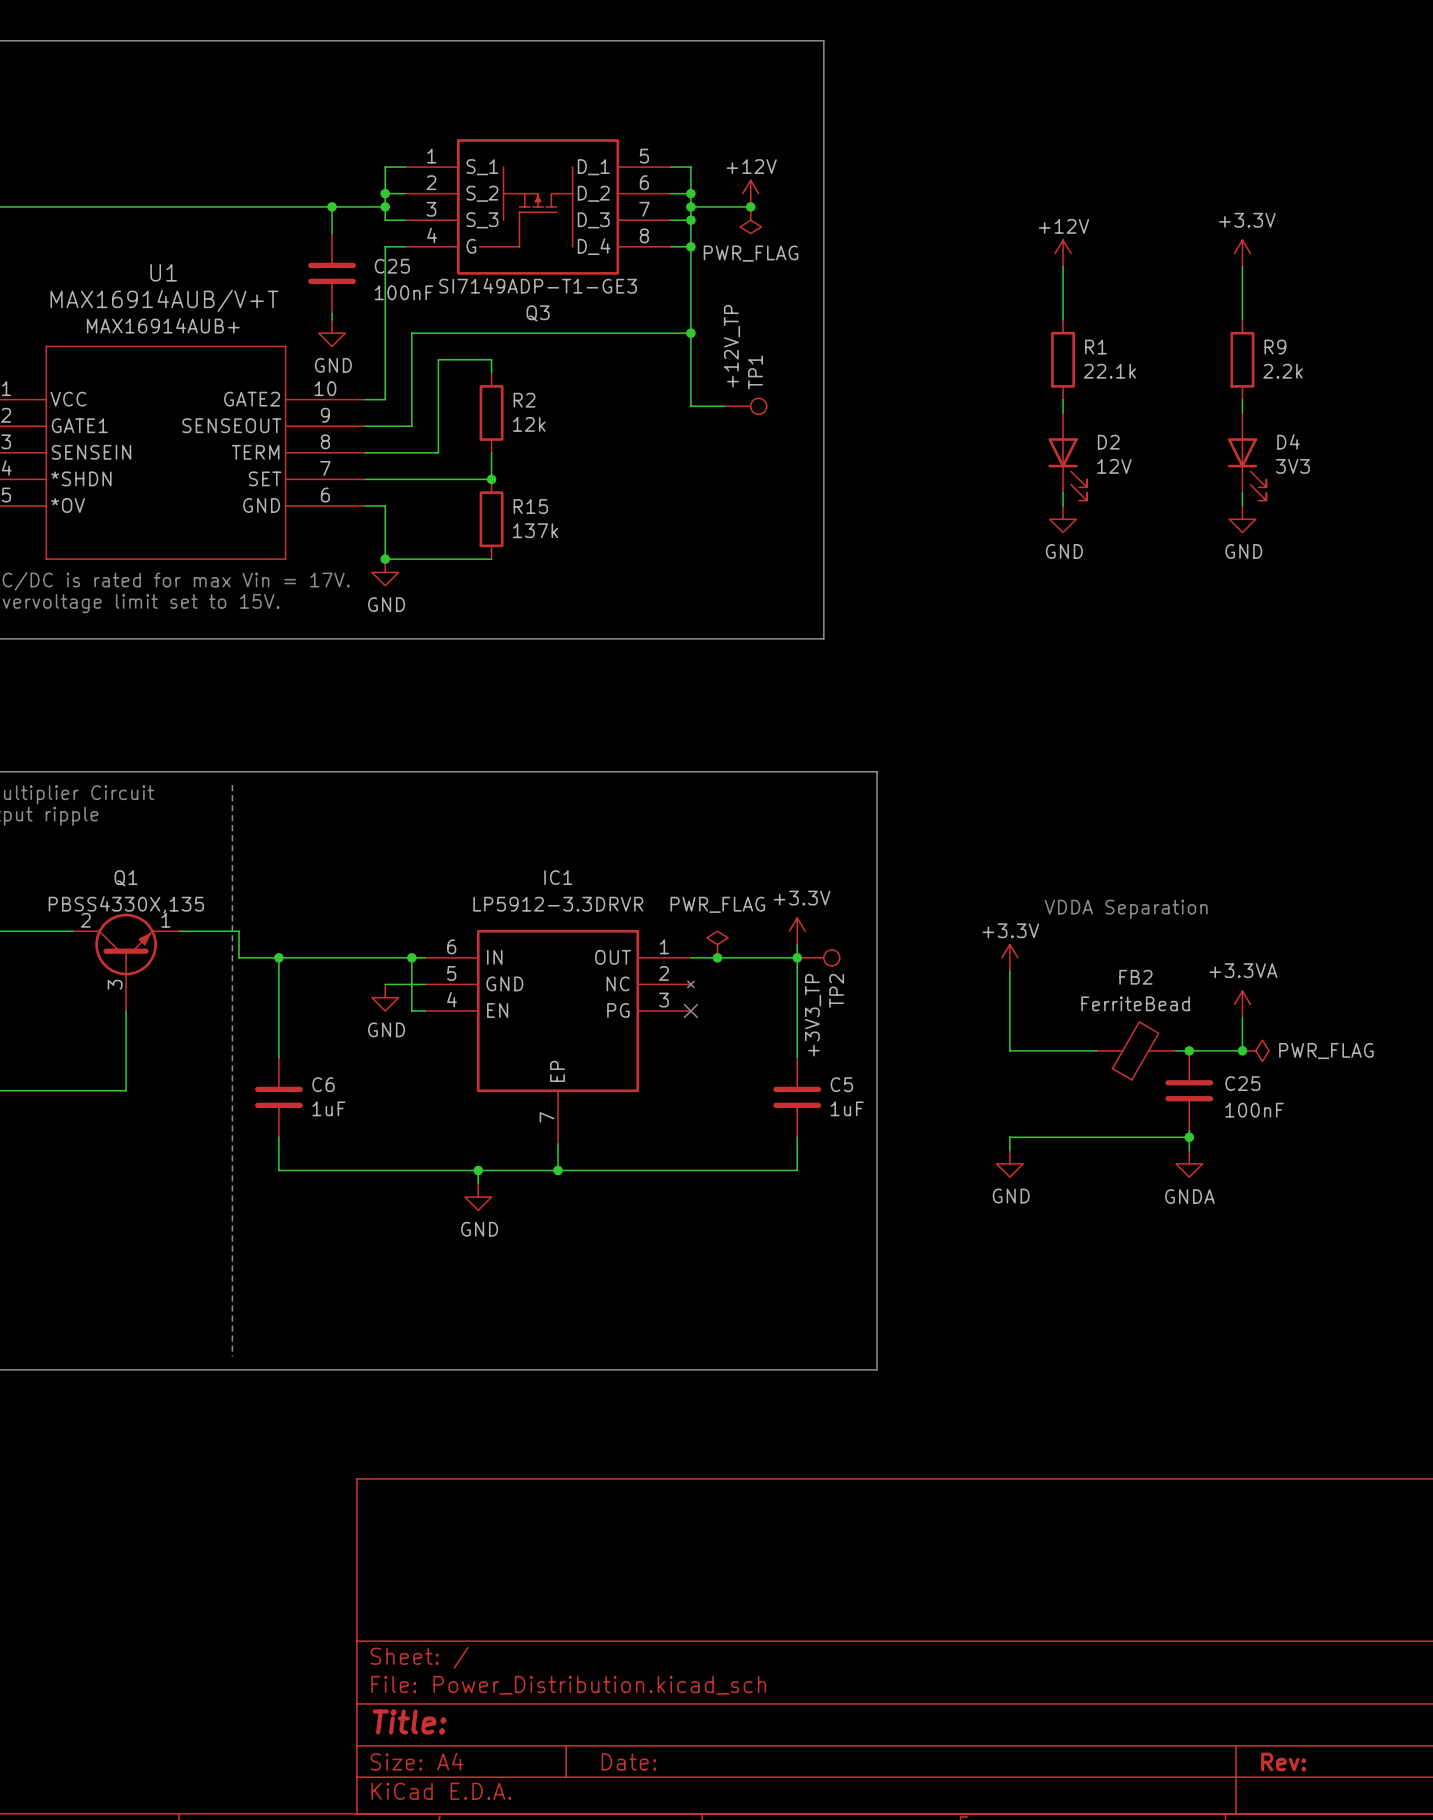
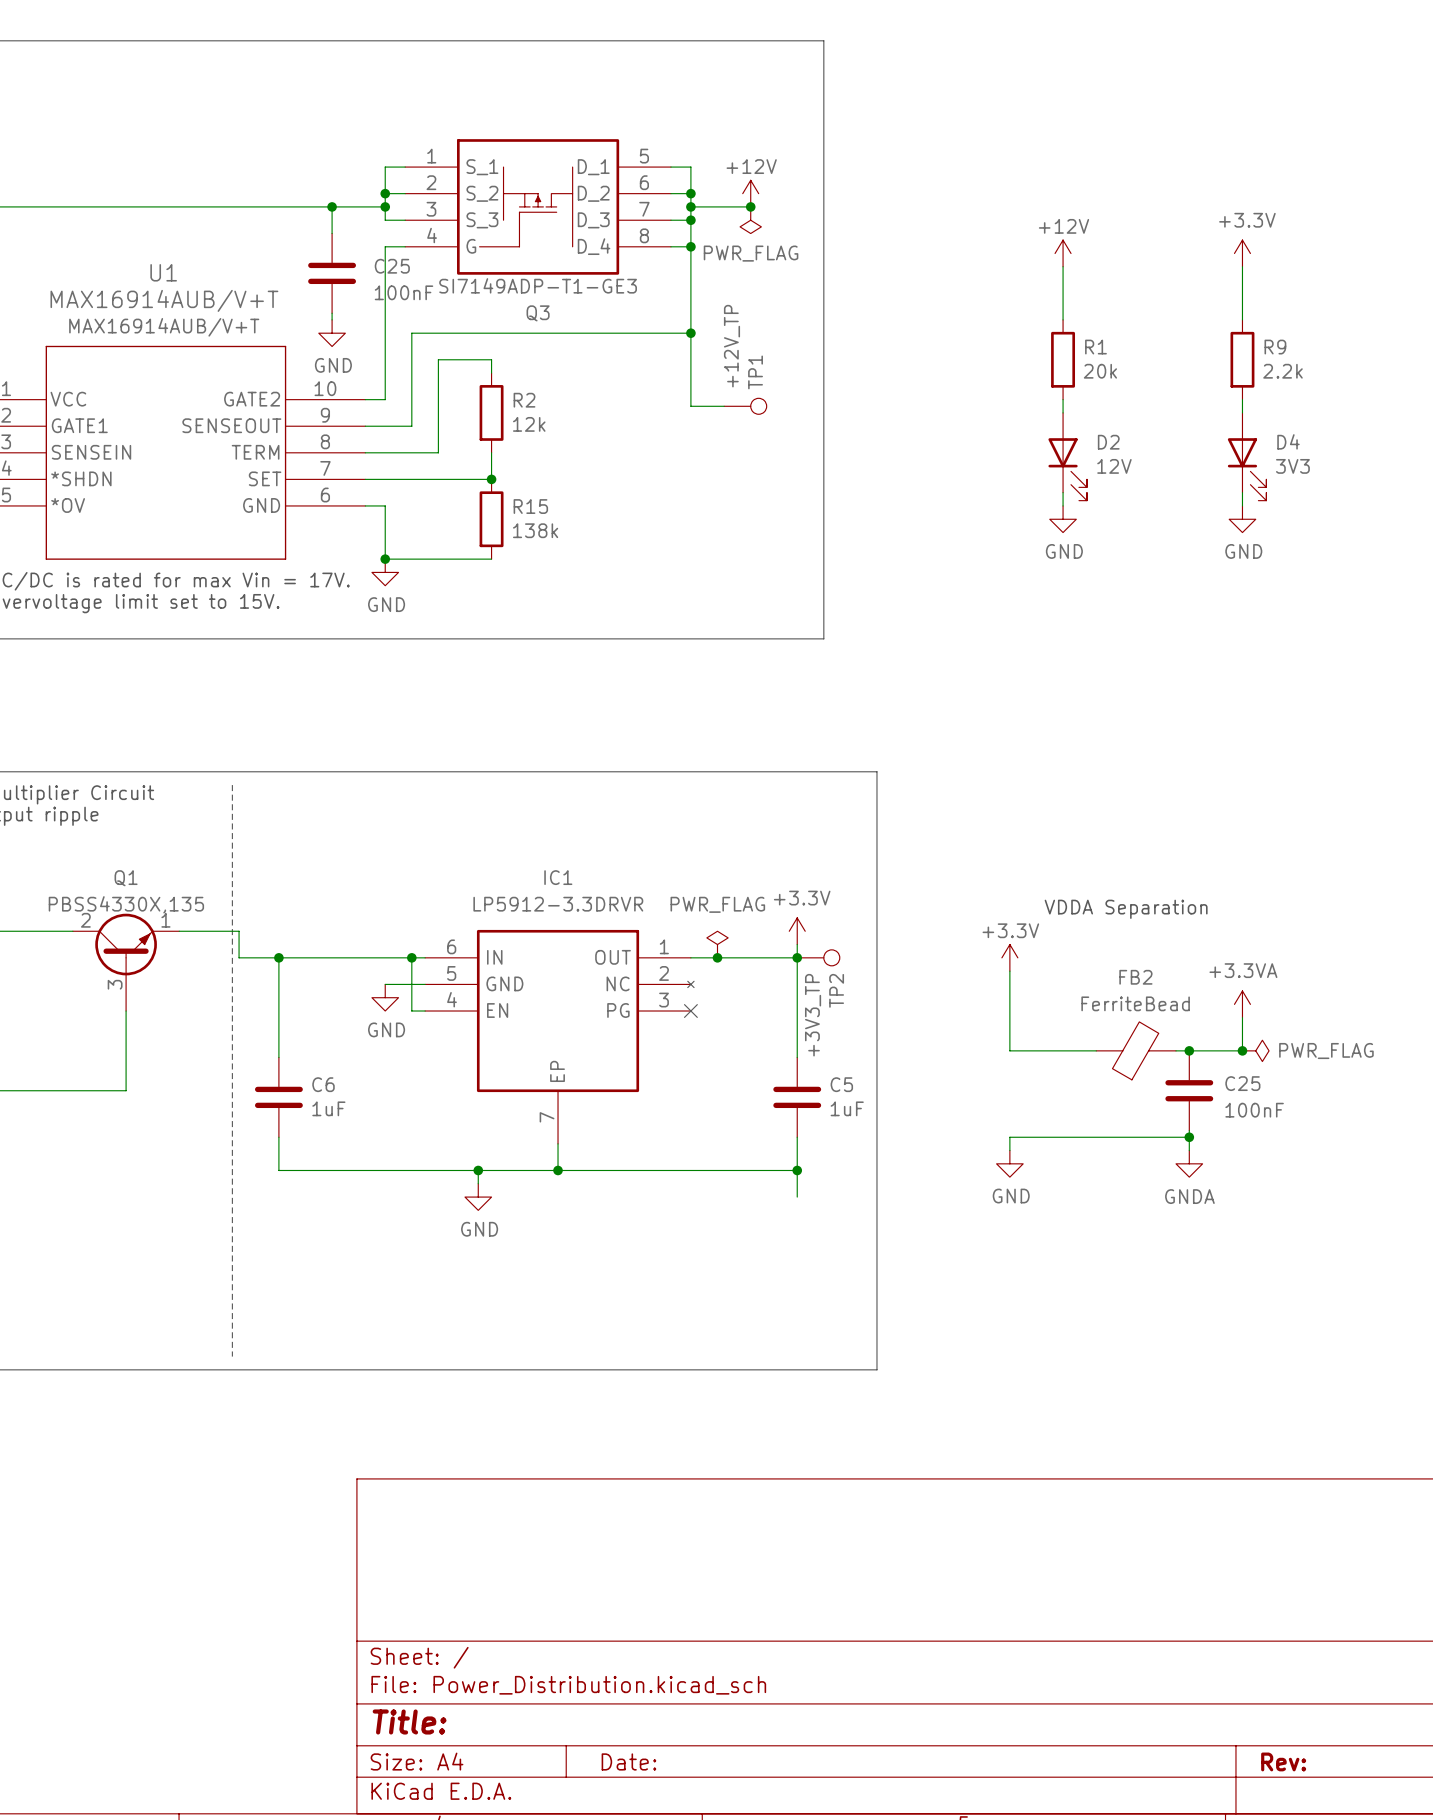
U1 text: MAX16914AUB+ (163, 325) -> MAX16914AUB/V+T (164, 327)
R1 value: 22.1k (1109, 371) -> 20k (1100, 371)
R15 value: 137k (535, 530) -> 138k (535, 530)
wire: none -> (797, 1170) (797, 1197)
junction: none -> (797, 1170)

